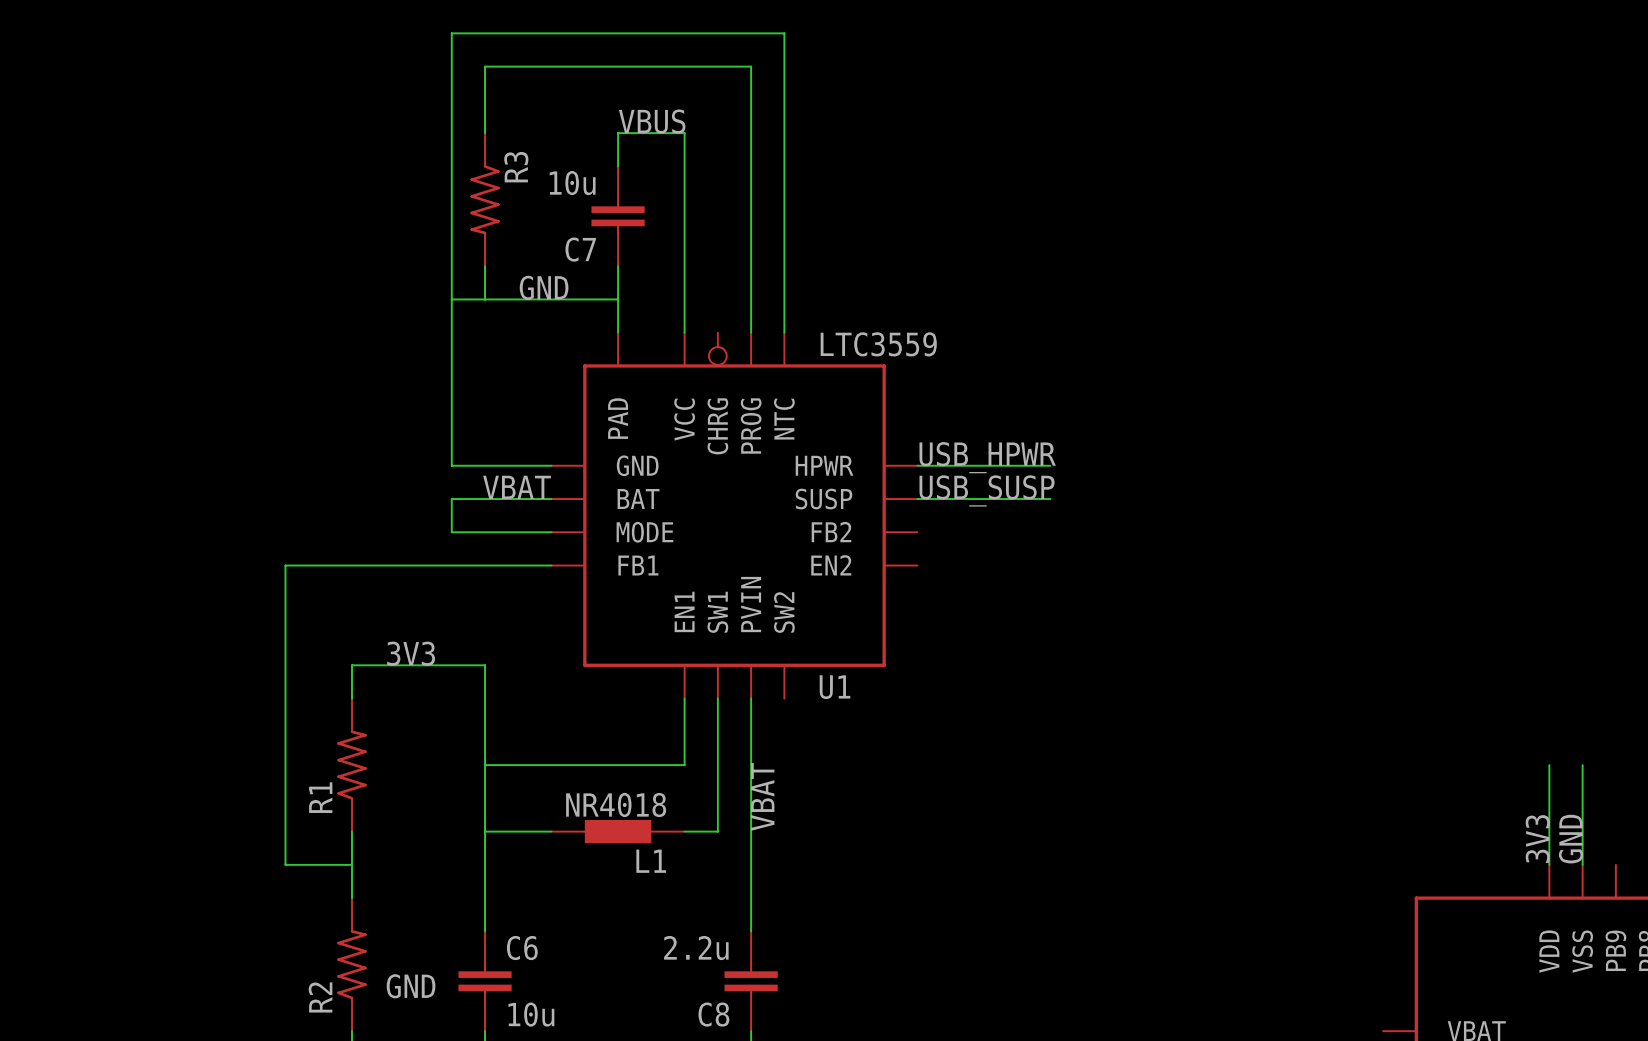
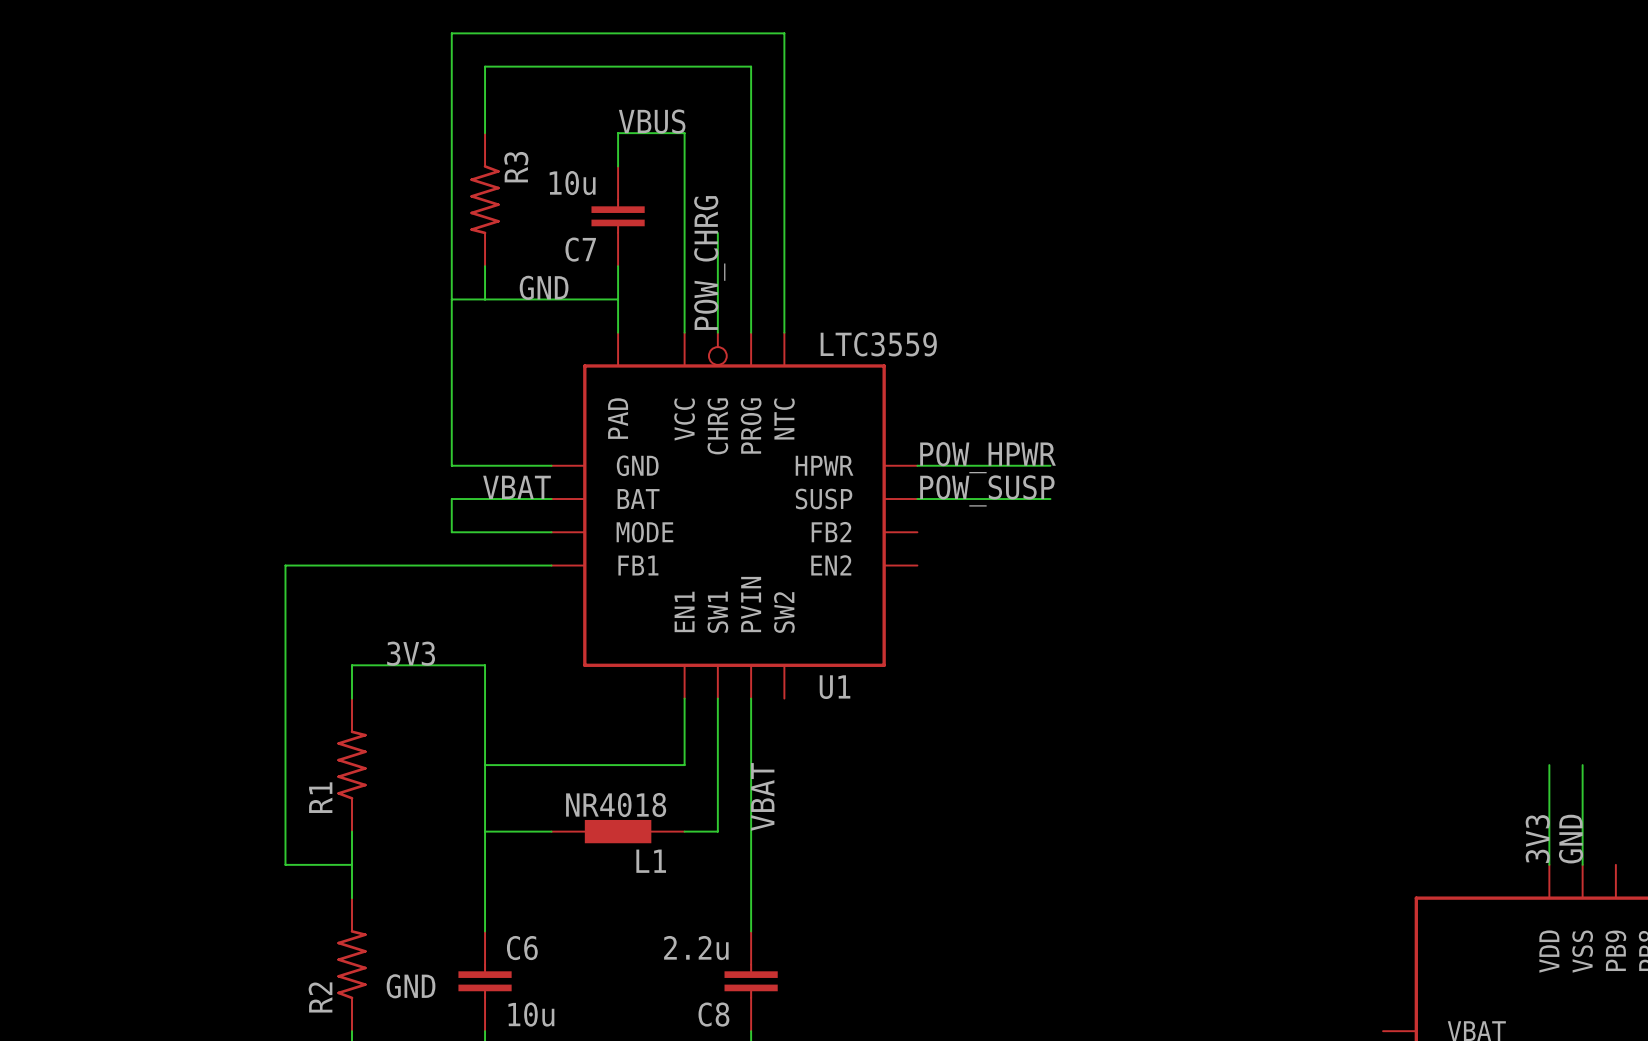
wire: none -> (717, 232) (717, 332)
label: none -> POW_CHRG (709, 263)
label: USB_HPWR (987, 457) -> POW_HPWR (988, 457)
label: USB_SUSP (987, 490) -> POW_SUSP (987, 490)

